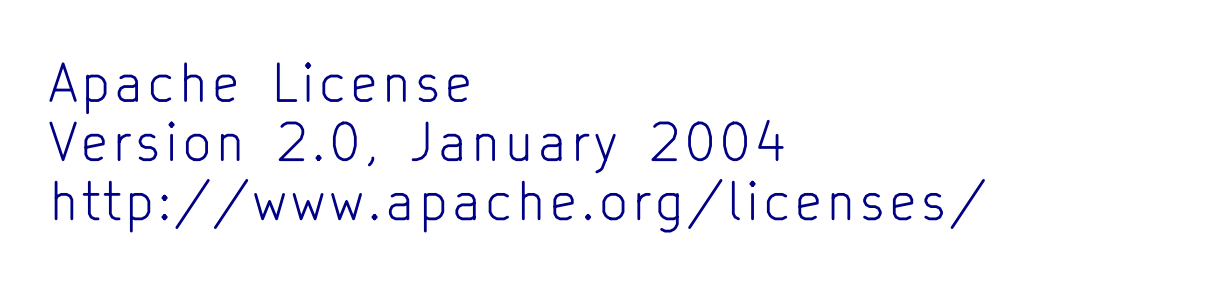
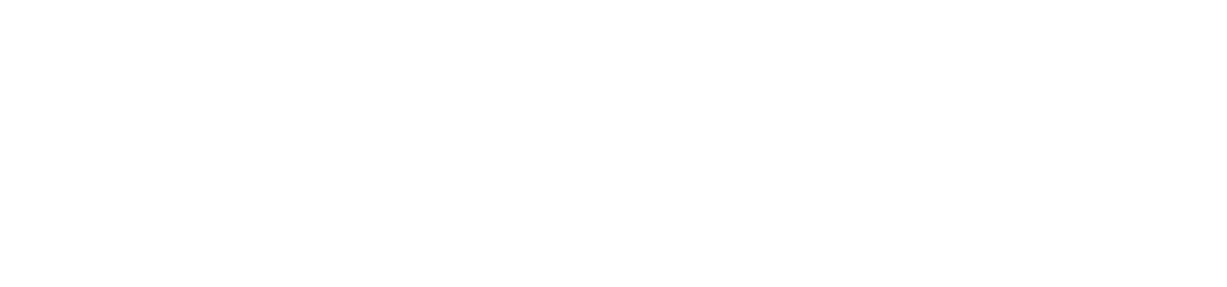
text: Apache License (259, 88) -> none
text: Version 2.0, January 2004 (416, 146) -> none
text: http://www.apache.org/licenses/ (519, 205) -> none

